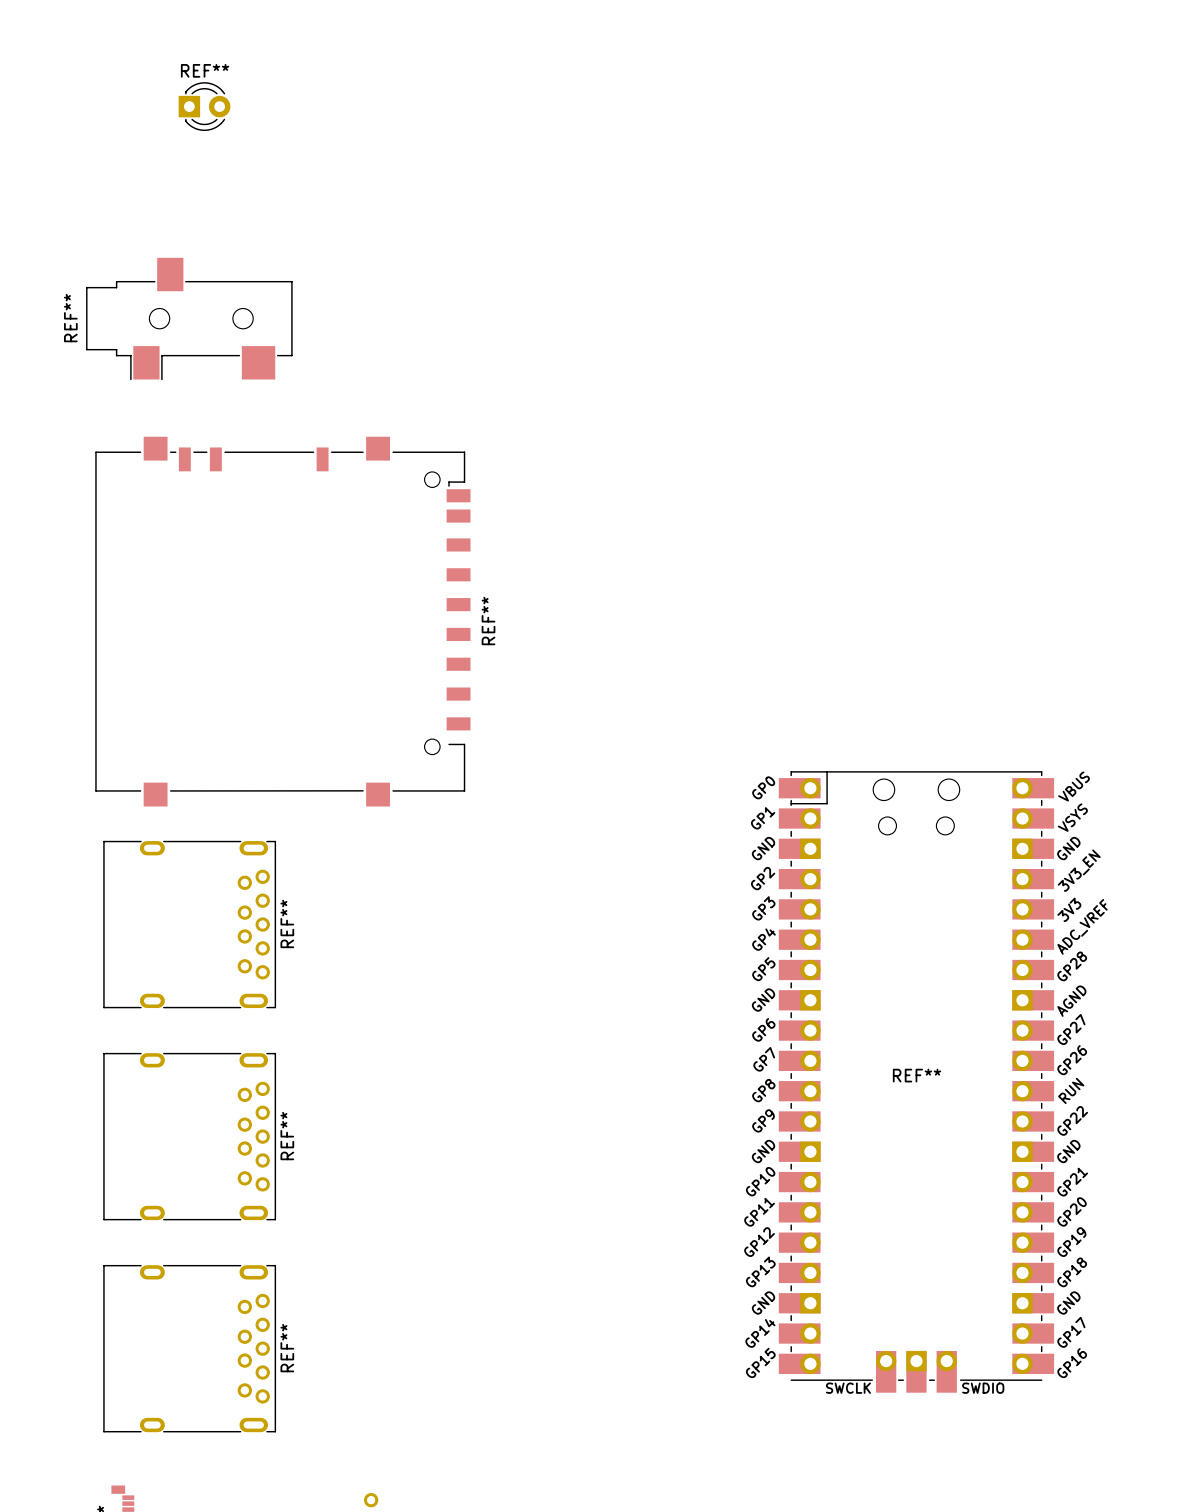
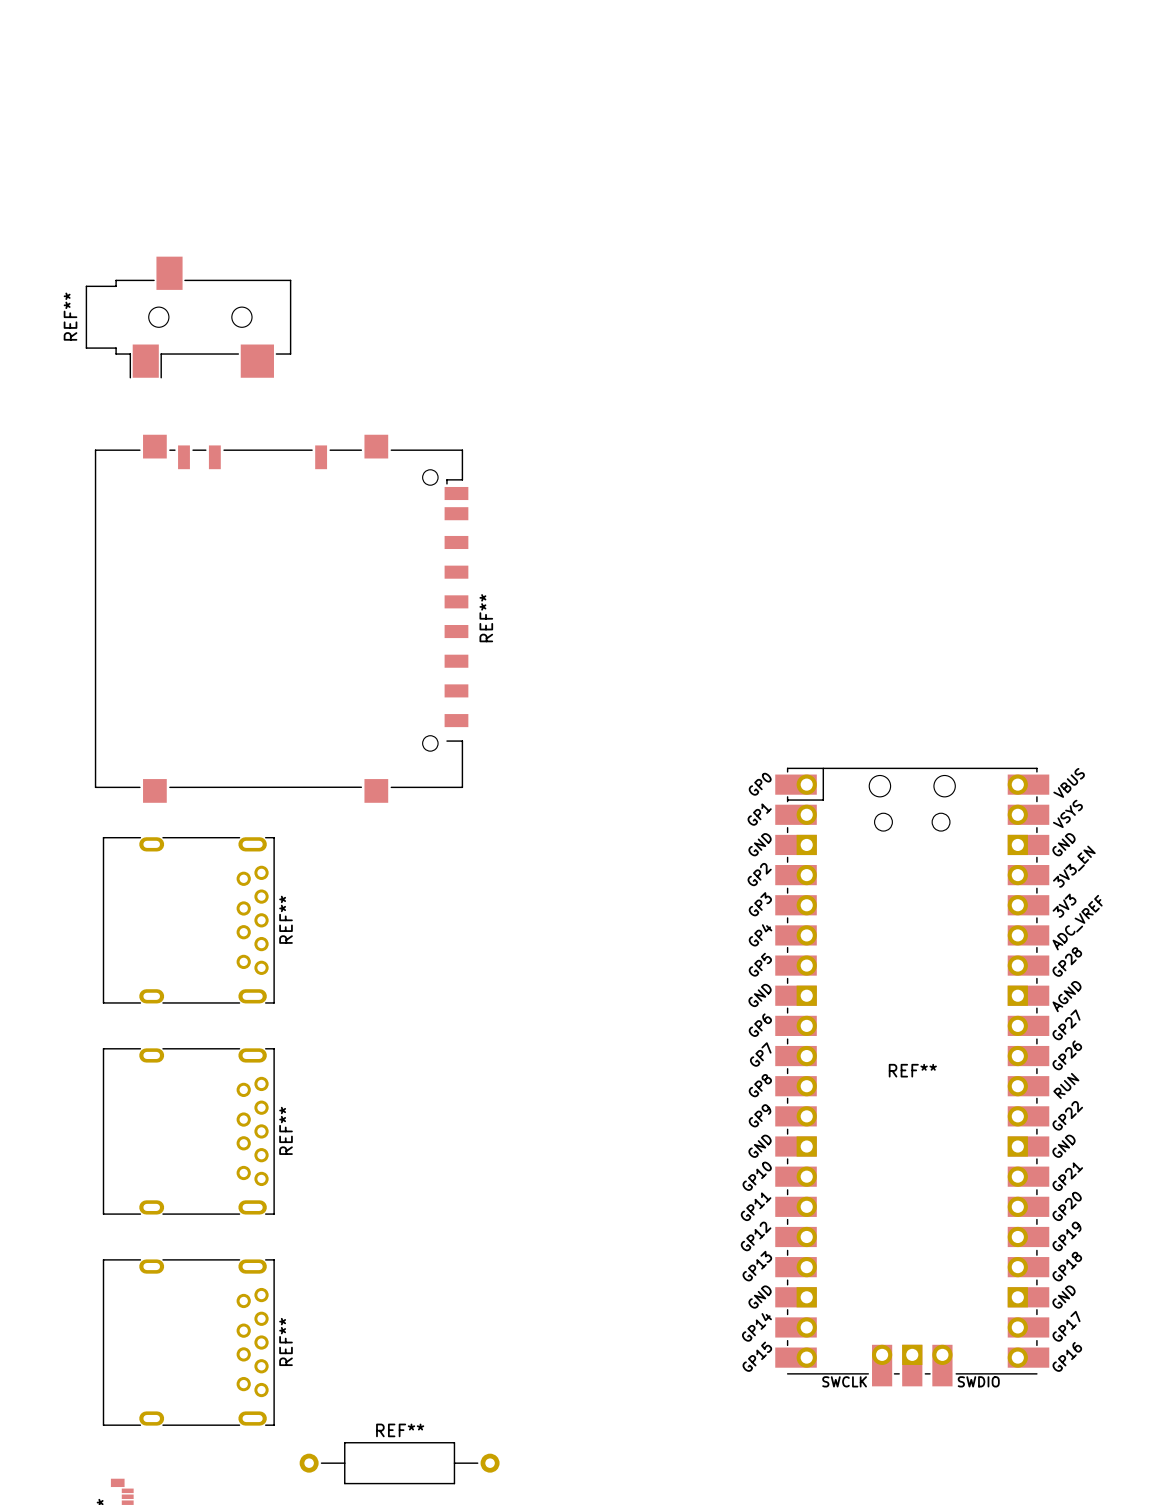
REF**: (204, 106) -> none
REF**: none -> (399, 1463)
part: (371, 1500) -> none

